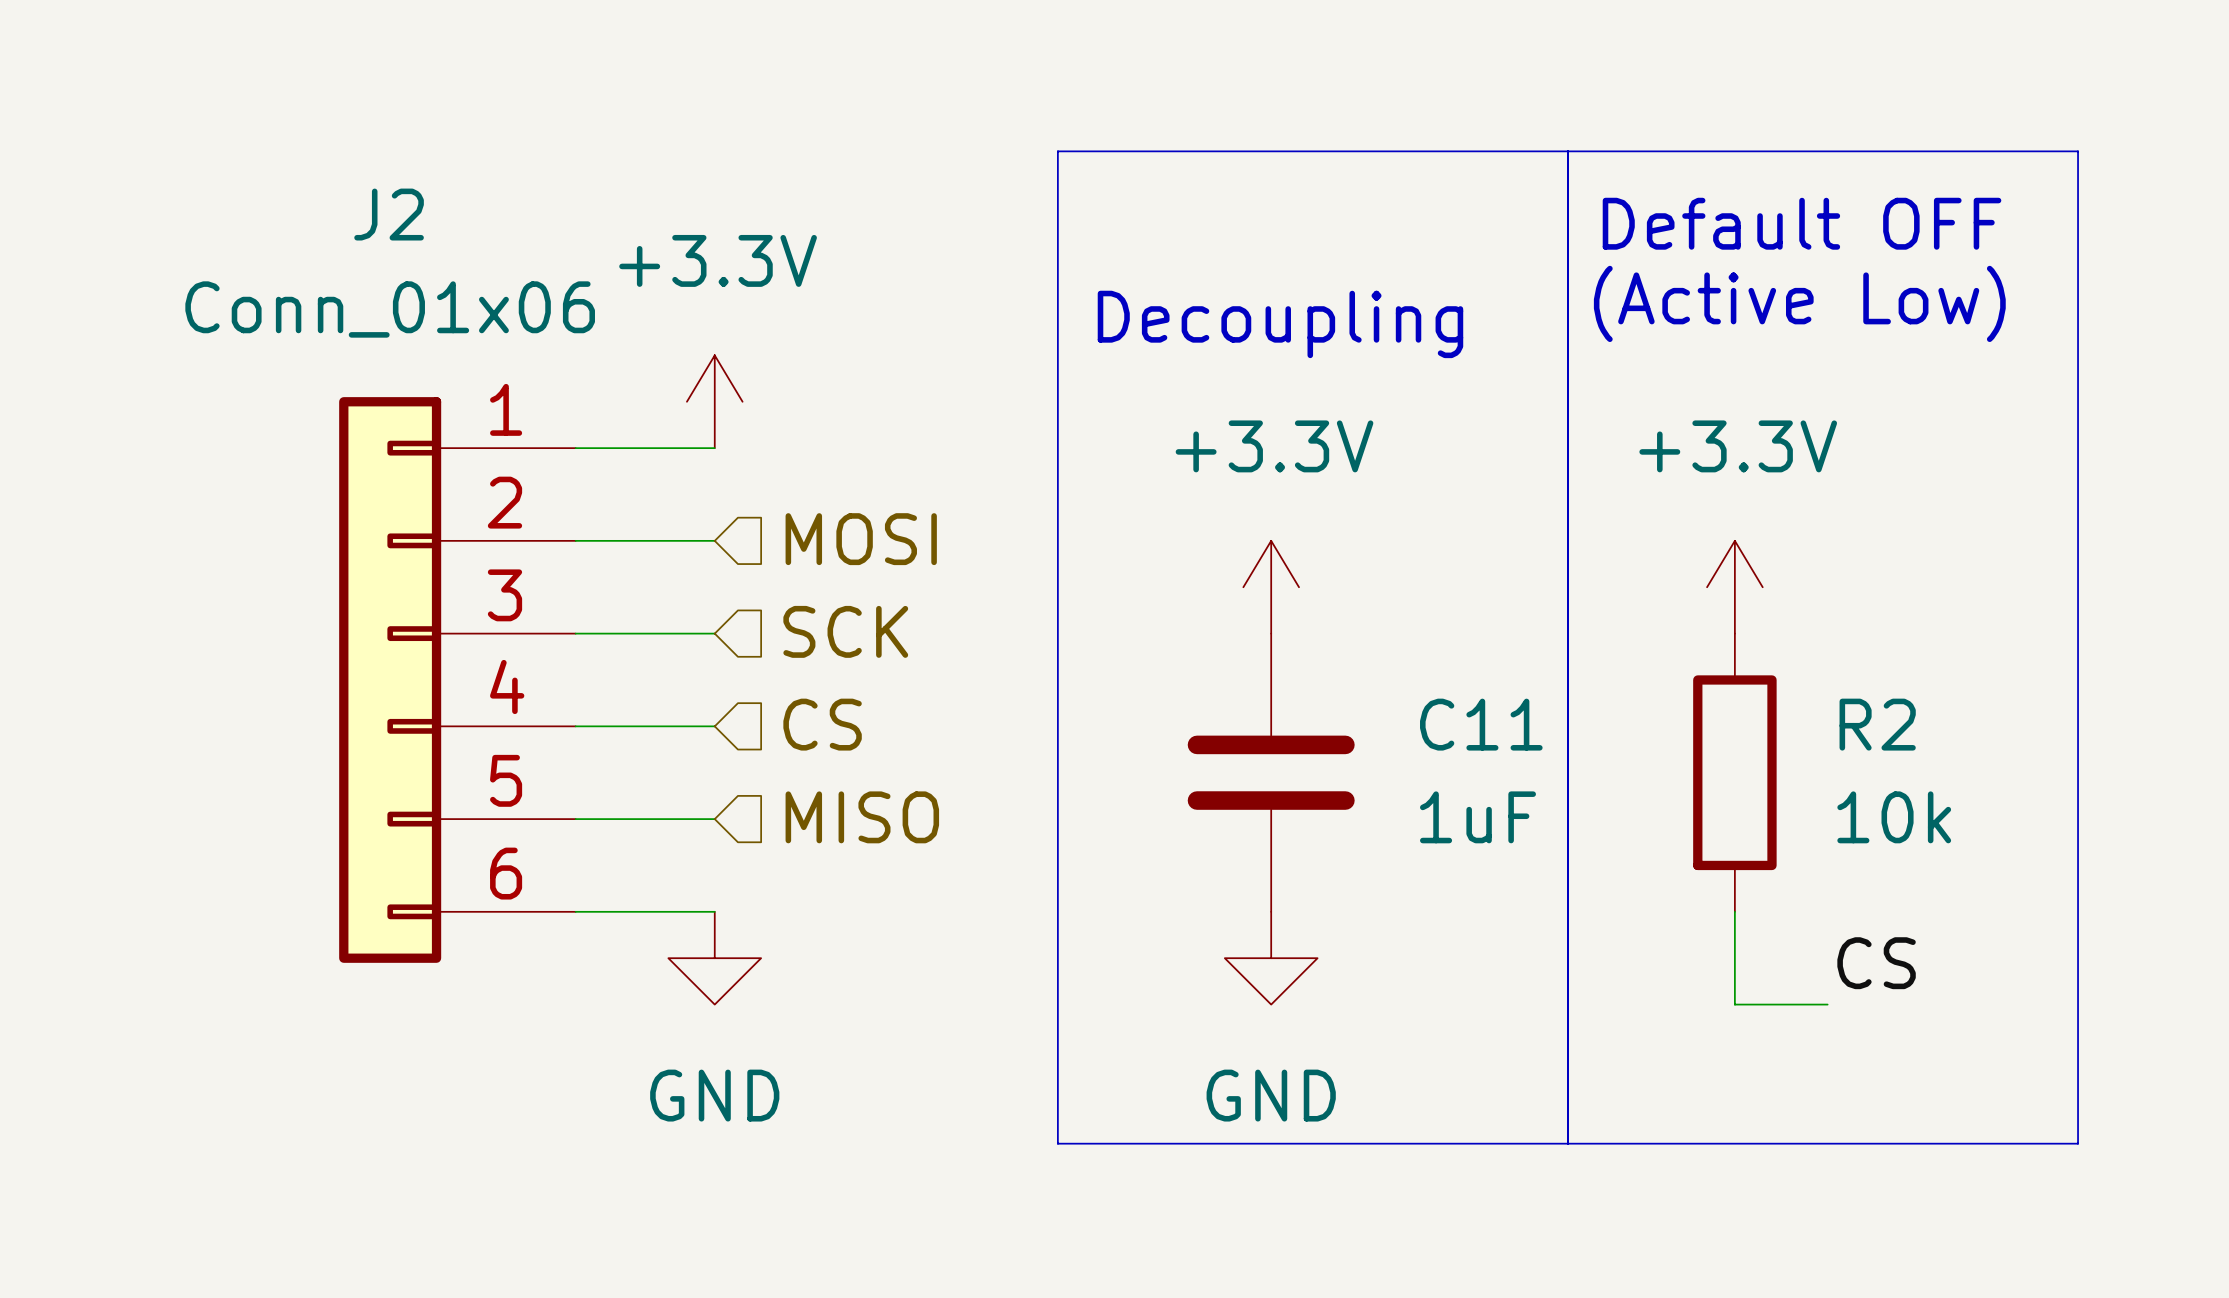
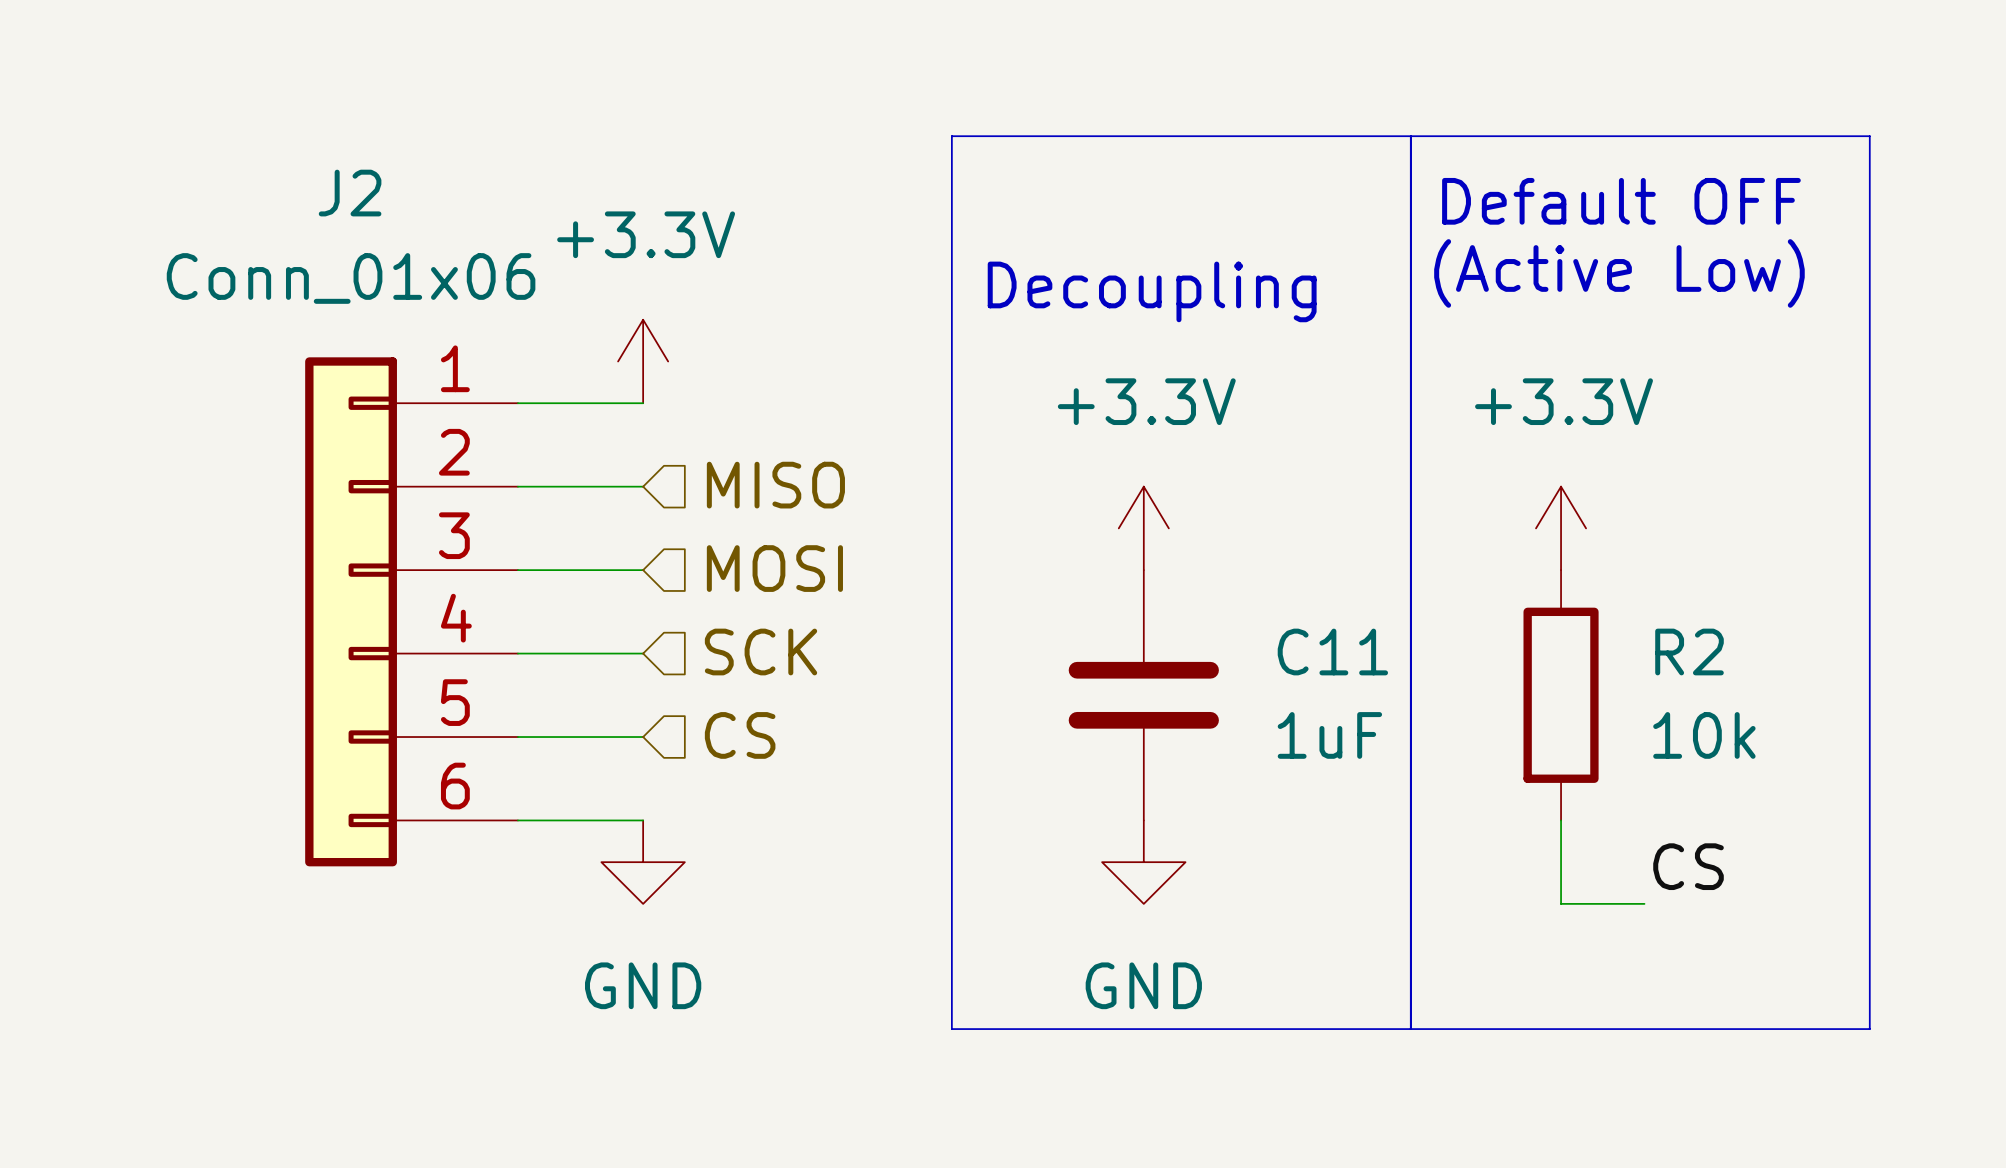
hierarchical label: MOSI (861, 539) -> MISO (775, 485)
hierarchical label: SCK (845, 631) -> MOSI (774, 568)
hierarchical label: CS (822, 724) -> SCK (761, 652)
hierarchical label: MISO (862, 817) -> CS (740, 735)

